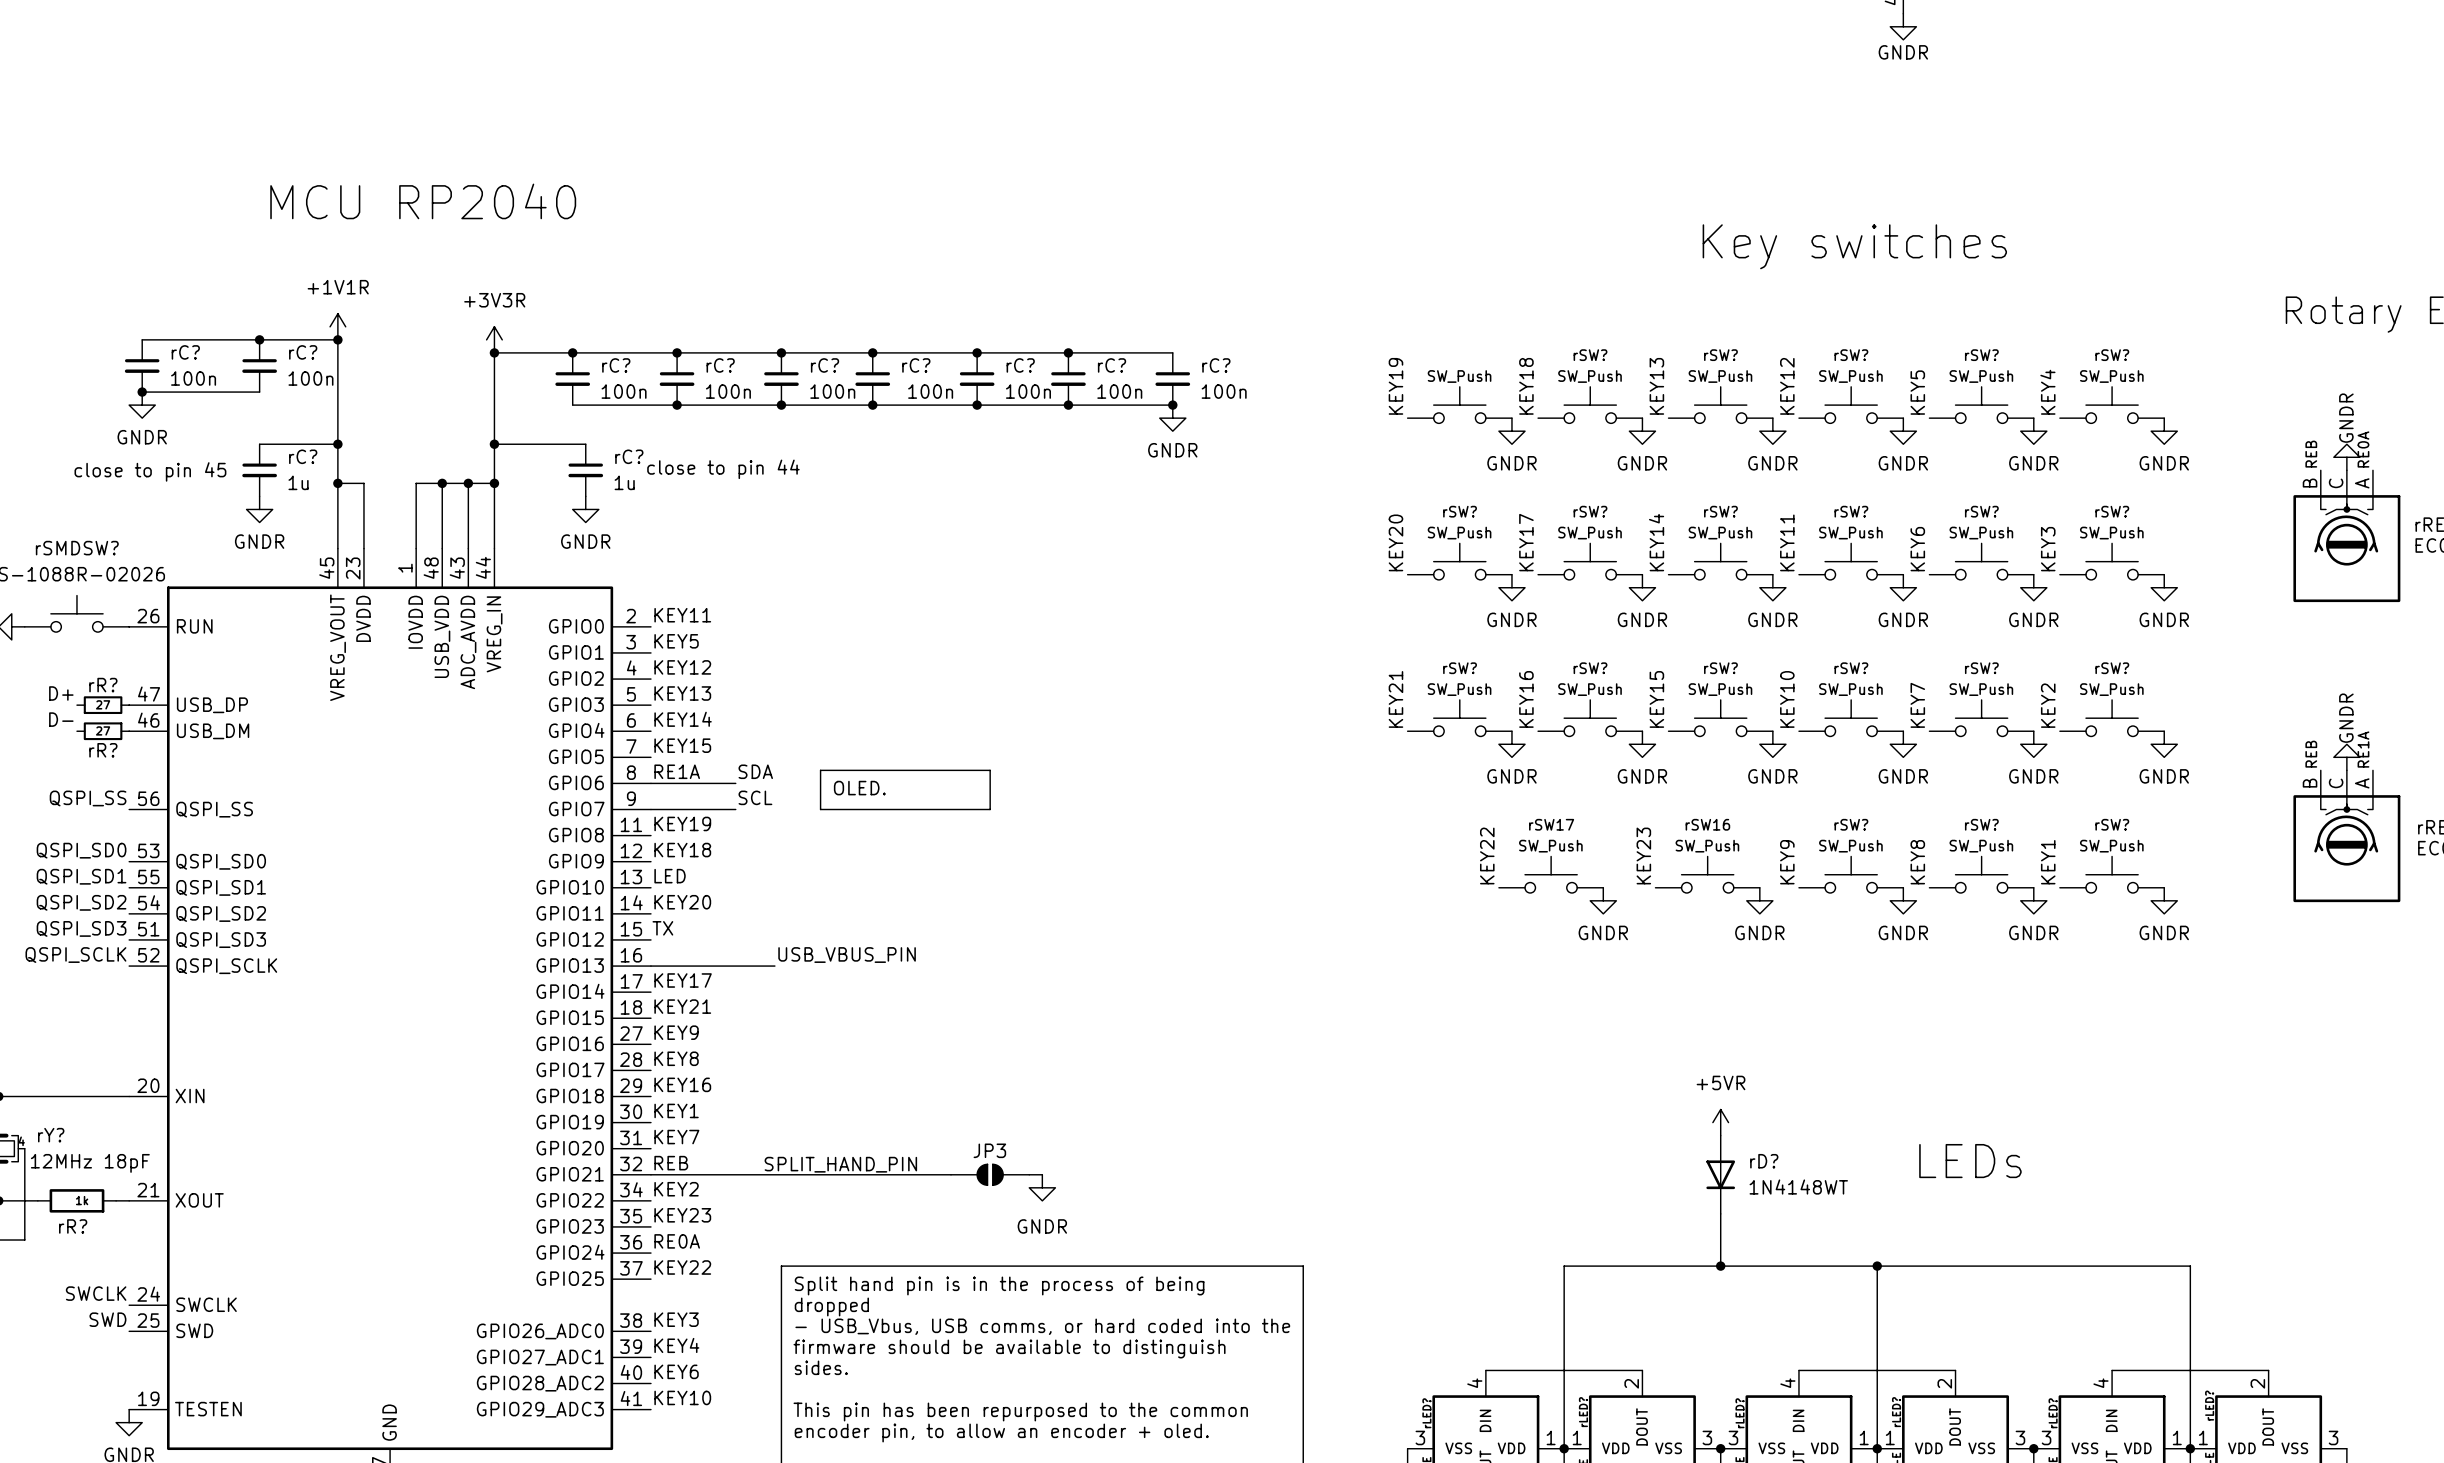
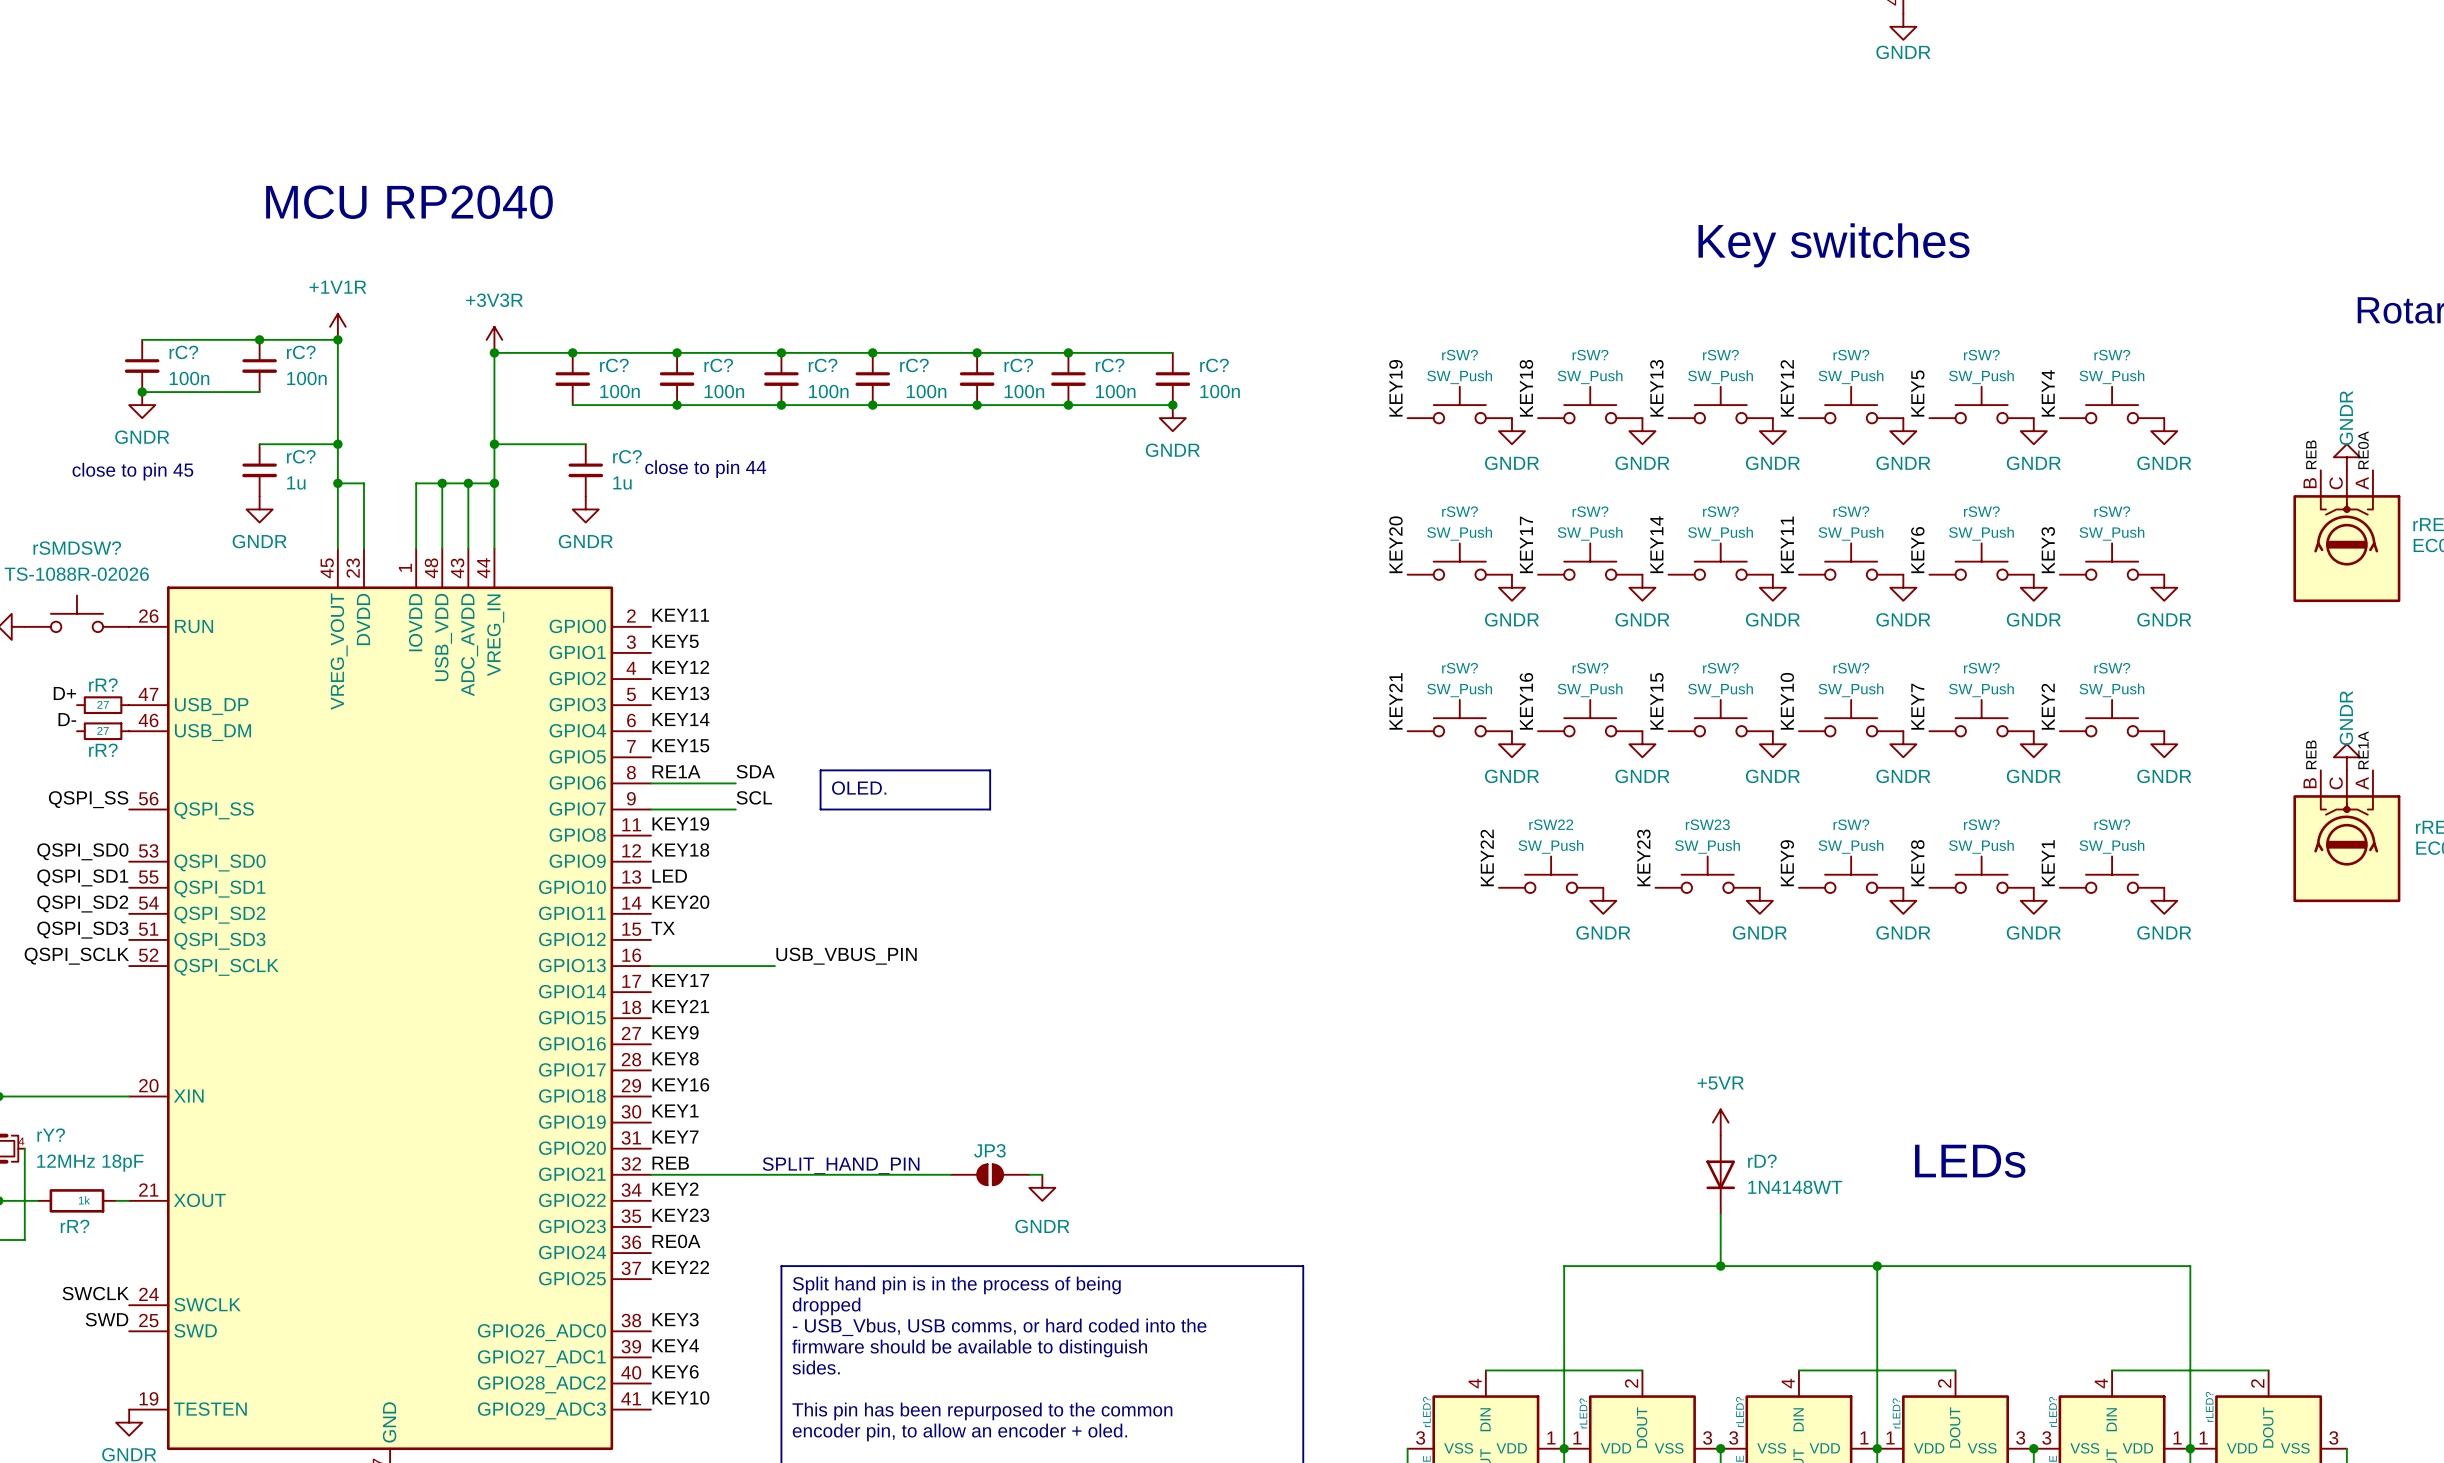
rSW? name: none -> rSW? (1460, 355)
rSW17 name: rSW17 (1551, 824) -> rSW22 (1551, 824)
rSW16 name: rSW16 (1707, 824) -> rSW23 (1707, 824)

